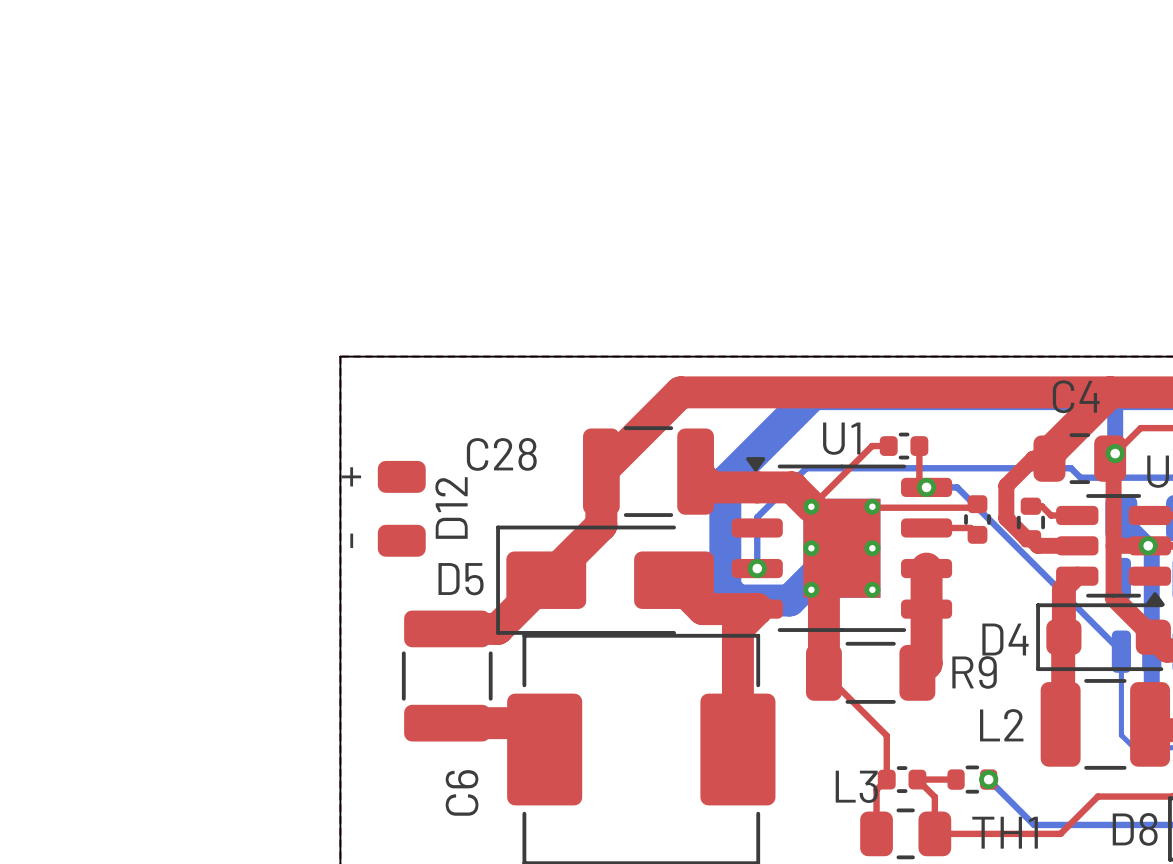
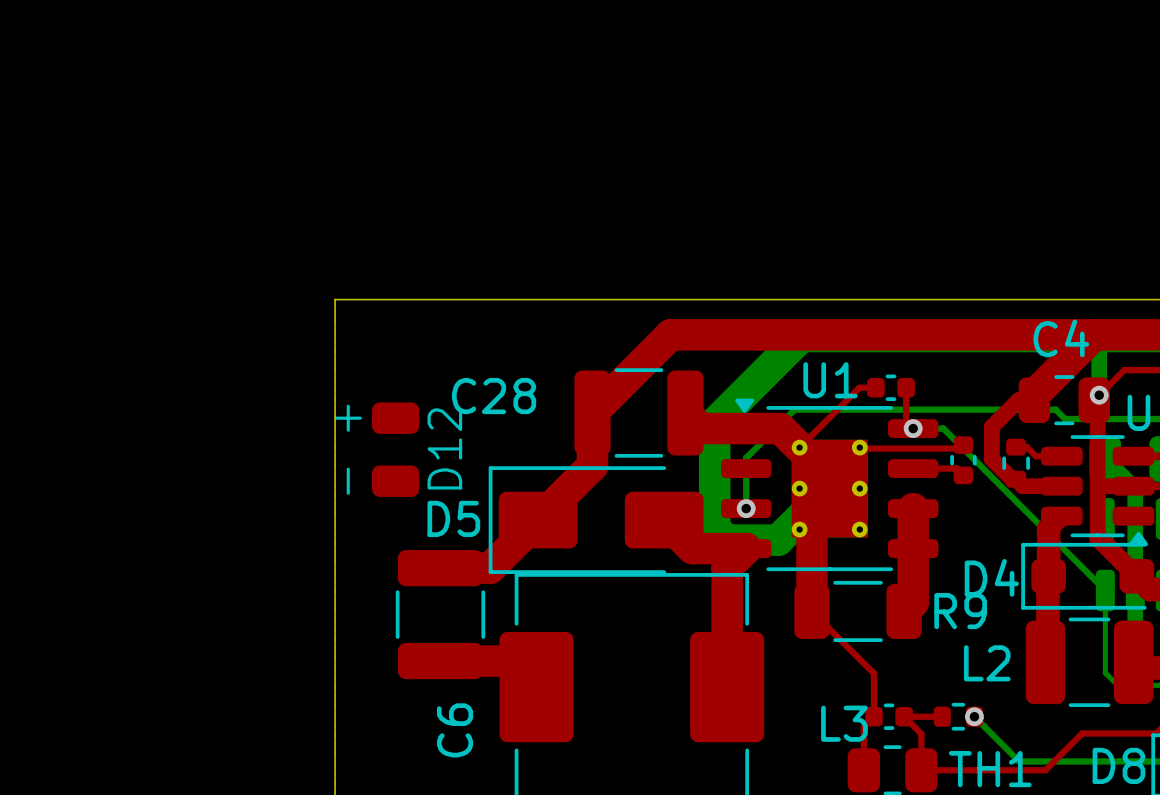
via: (1148, 545) -> none

